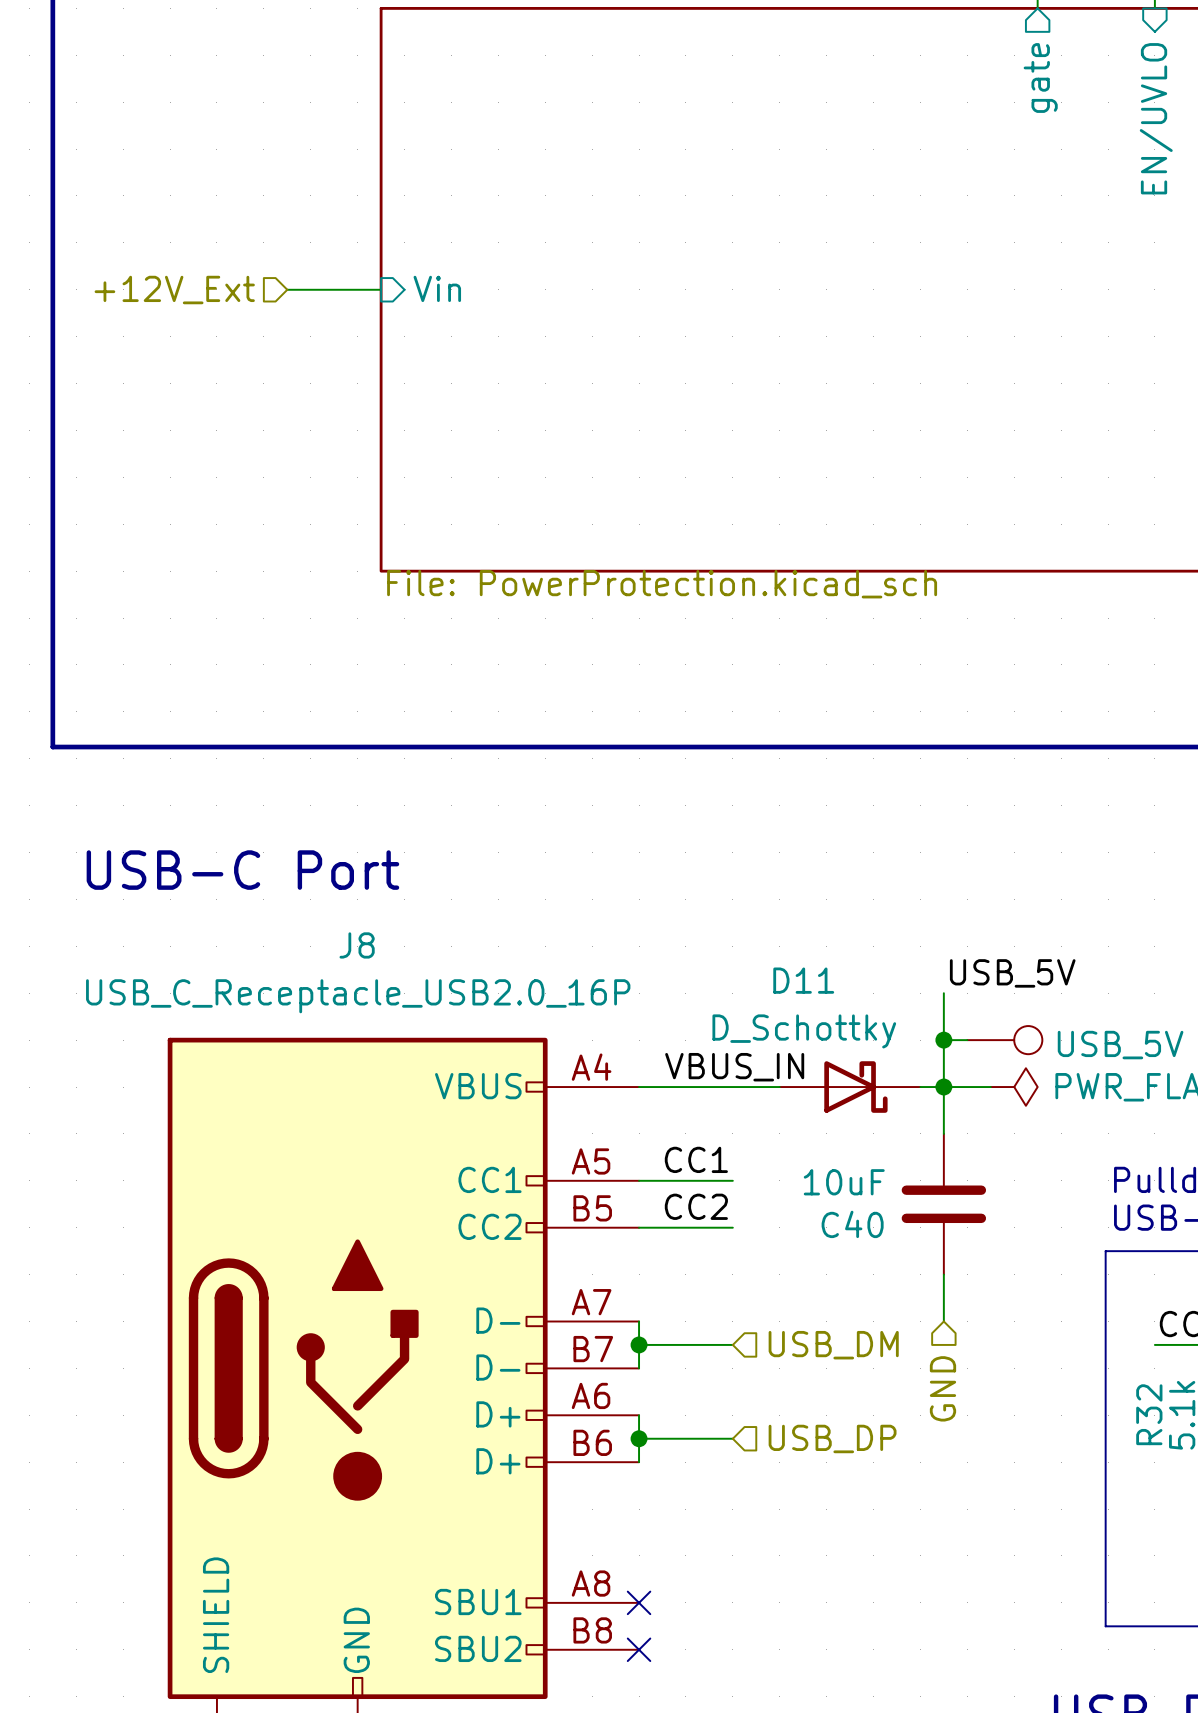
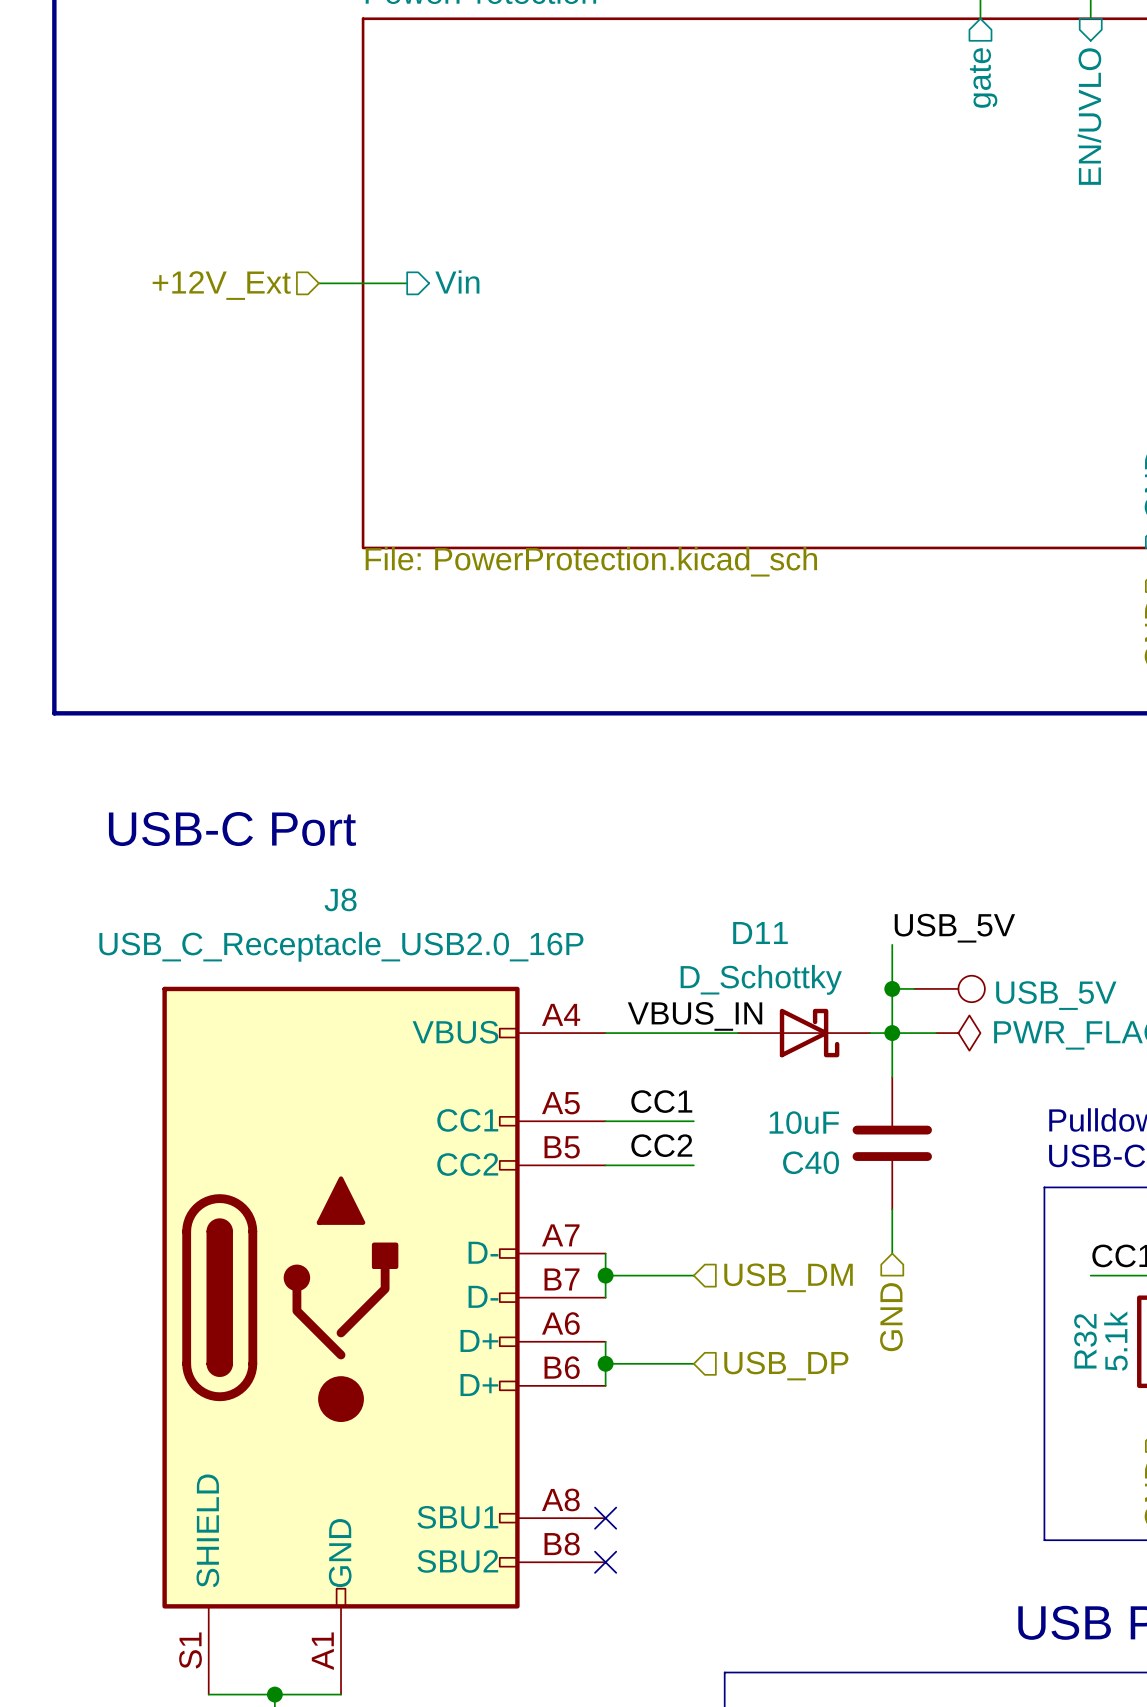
sheet pin position: Vin (437, 288) -> Vin (457, 281)
wire: (287, 289) (334, 289) -> (363, 283) (407, 283)
hierarchical label position: +12V_Ext (174, 290) -> +12V_Ext (221, 285)

